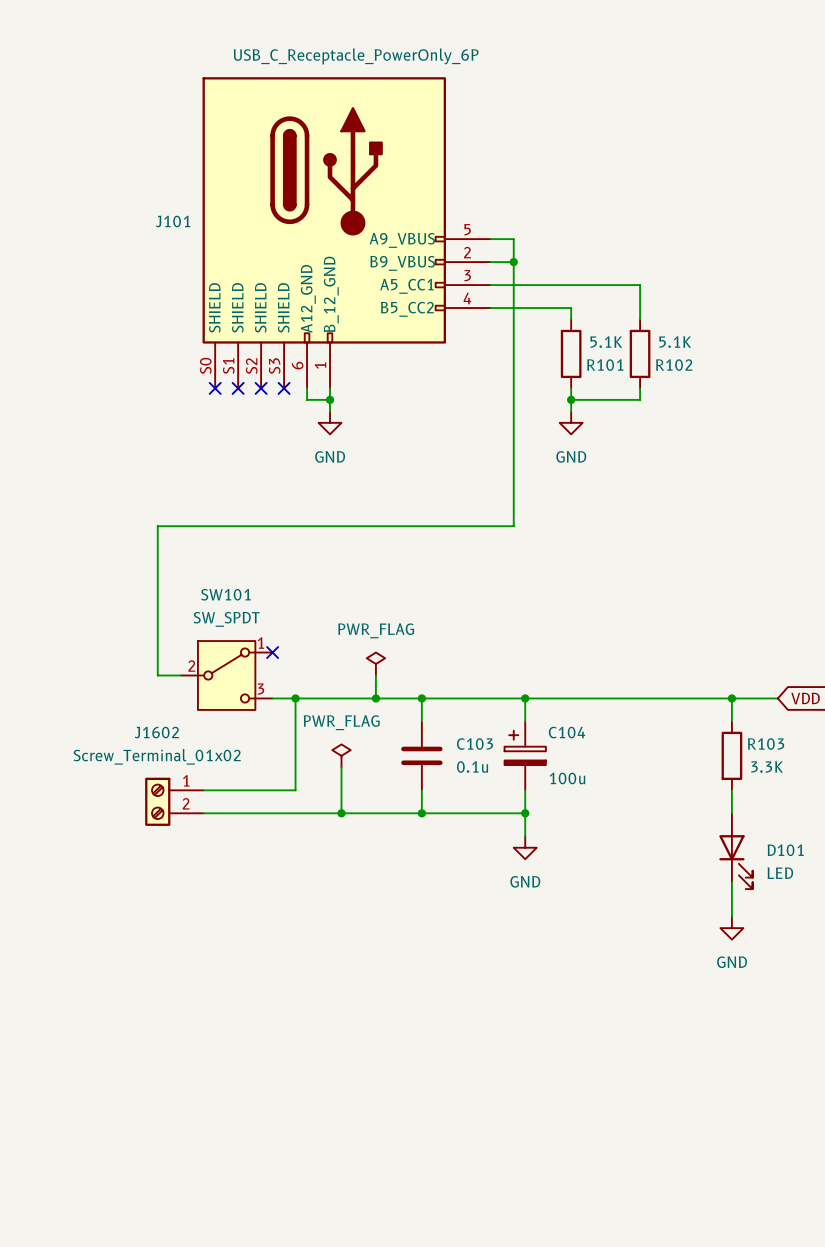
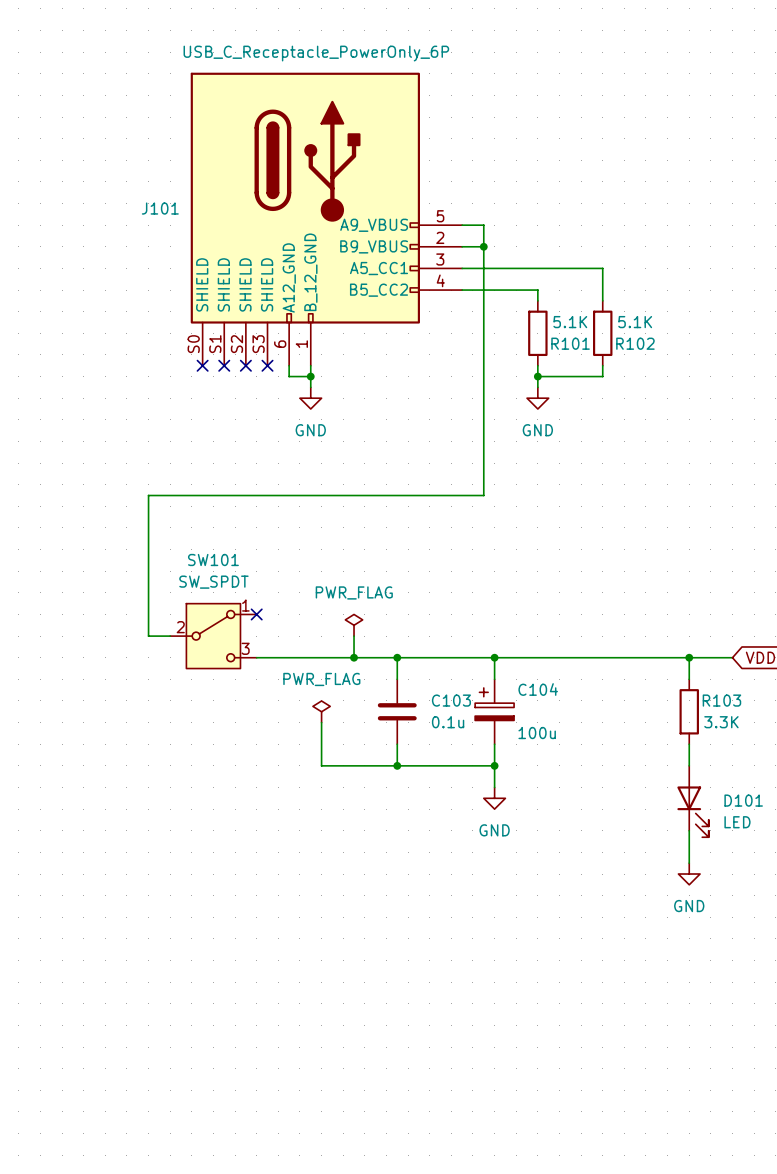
wire: (295, 698) (295, 790) (203, 790) -> none
junction: (295, 698) -> none
J1602: Screw_Terminal_01x02 (174, 801) -> none
wire: (203, 813) (341, 813) -> none
junction: (341, 813) -> none

